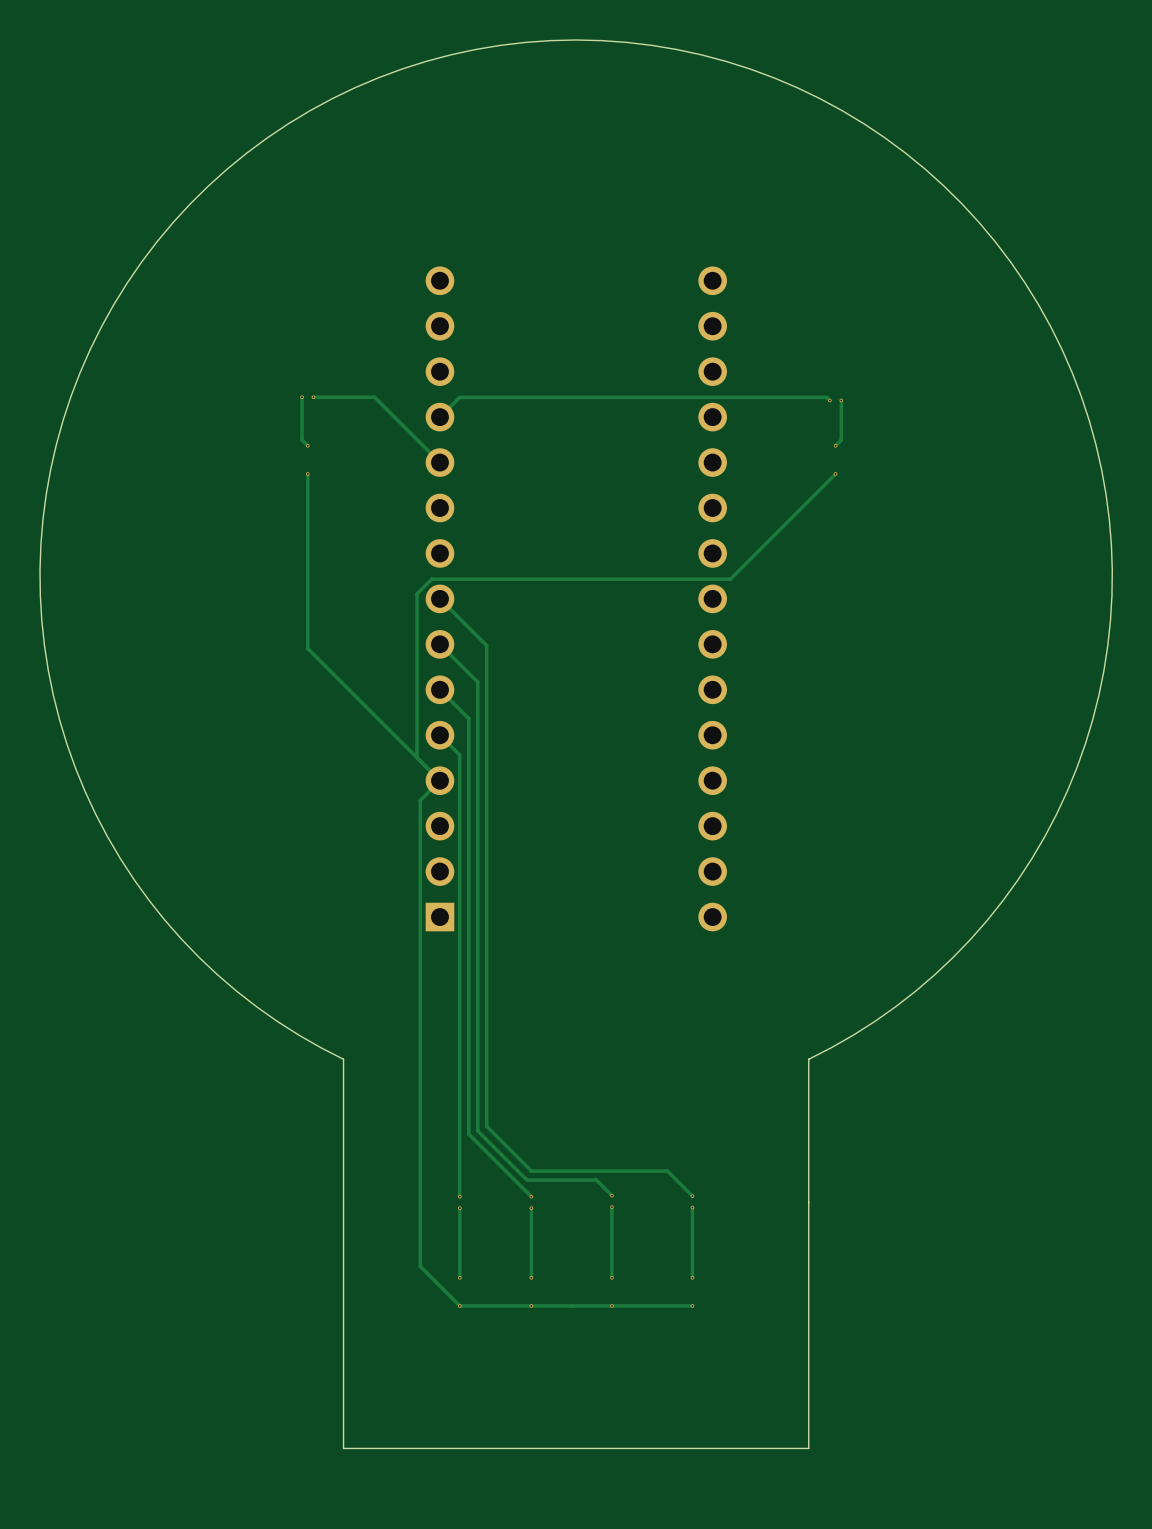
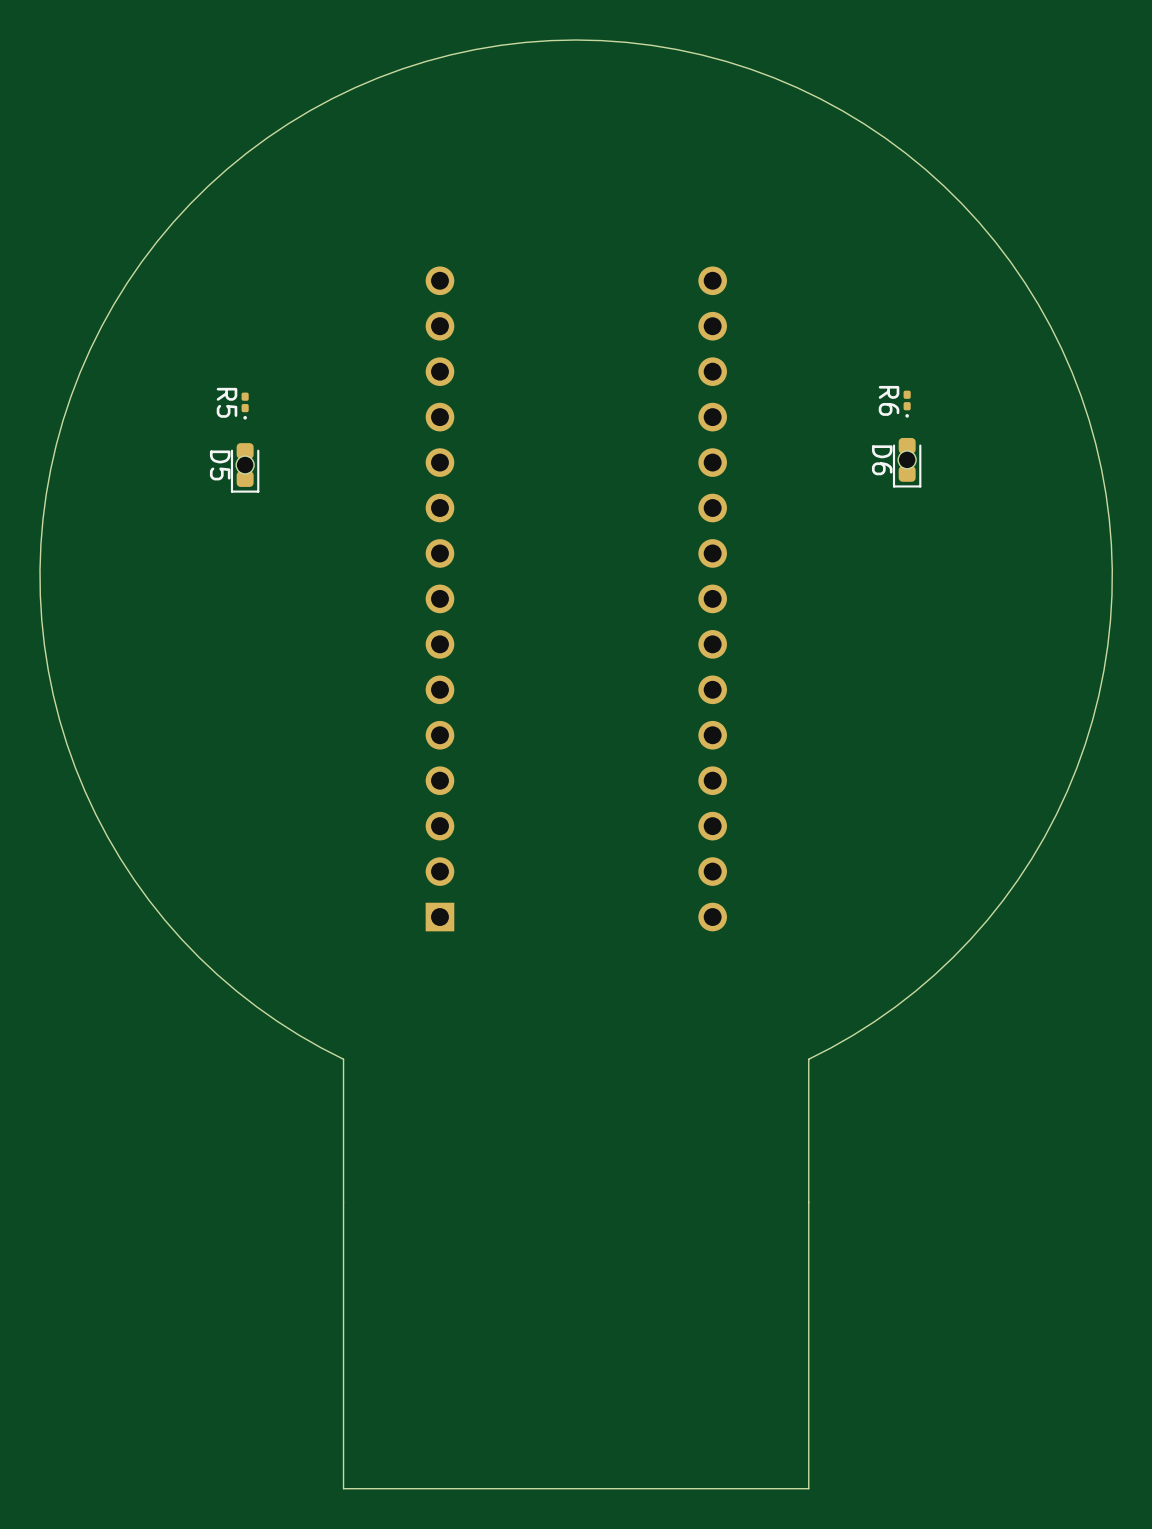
track: (302, 397) (302, 440) (307, 445) -> none
via: (302, 397) -> none
track: (313, 397) (374, 397) (439, 462) -> none
via: (313, 397) -> none
track: (829, 400) (826, 397) (459, 397) (439, 417) -> none
via: (829, 400) -> none
track: (841, 400) (841, 440) (835, 445) -> none
via: (841, 400) -> none
R6: none -> (907, 404)
R5: none -> (245, 406)
via: (307, 445) -> none
via: (835, 445) -> none
part: none -> (907, 459)
D6: none -> (907, 462)
part: none -> (245, 465)
D5: none -> (245, 467)
track: (307, 473) (307, 648) (439, 780) (420, 800) (420, 1266) (459, 1305) (692, 1305) -> none
via: (307, 473) -> none
track: (835, 473) (730, 579) (431, 579) (416, 594) (416, 757) -> none
via: (835, 473) -> none
track: (439, 598) (486, 645) (486, 1126) (531, 1171) (667, 1171) (692, 1196) -> none
track: (439, 644) (477, 682) (477, 1130) (526, 1180) (596, 1180) (611, 1195) -> none
track: (439, 689) (468, 718) (468, 1134) (531, 1196) -> none
track: (439, 735) (459, 754) (459, 1196) -> none
via: (611, 1195) -> none
via: (459, 1196) -> none
via: (531, 1196) -> none
via: (692, 1196) -> none
track: (611, 1207) (611, 1277) -> none
via: (611, 1207) -> none
track: (692, 1207) (692, 1277) -> none
via: (692, 1207) -> none
track: (459, 1208) (459, 1277) -> none
via: (459, 1208) -> none
track: (531, 1208) (531, 1277) -> none
via: (531, 1208) -> none
via: (459, 1277) -> none
via: (531, 1277) -> none
via: (611, 1277) -> none
via: (692, 1277) -> none
via: (459, 1305) -> none
via: (531, 1305) -> none
via: (611, 1305) -> none
via: (692, 1305) -> none
board edge: (808, 1448) (343, 1448) -> (808, 1448) (808, 1488) (343, 1488) (343, 1448)

